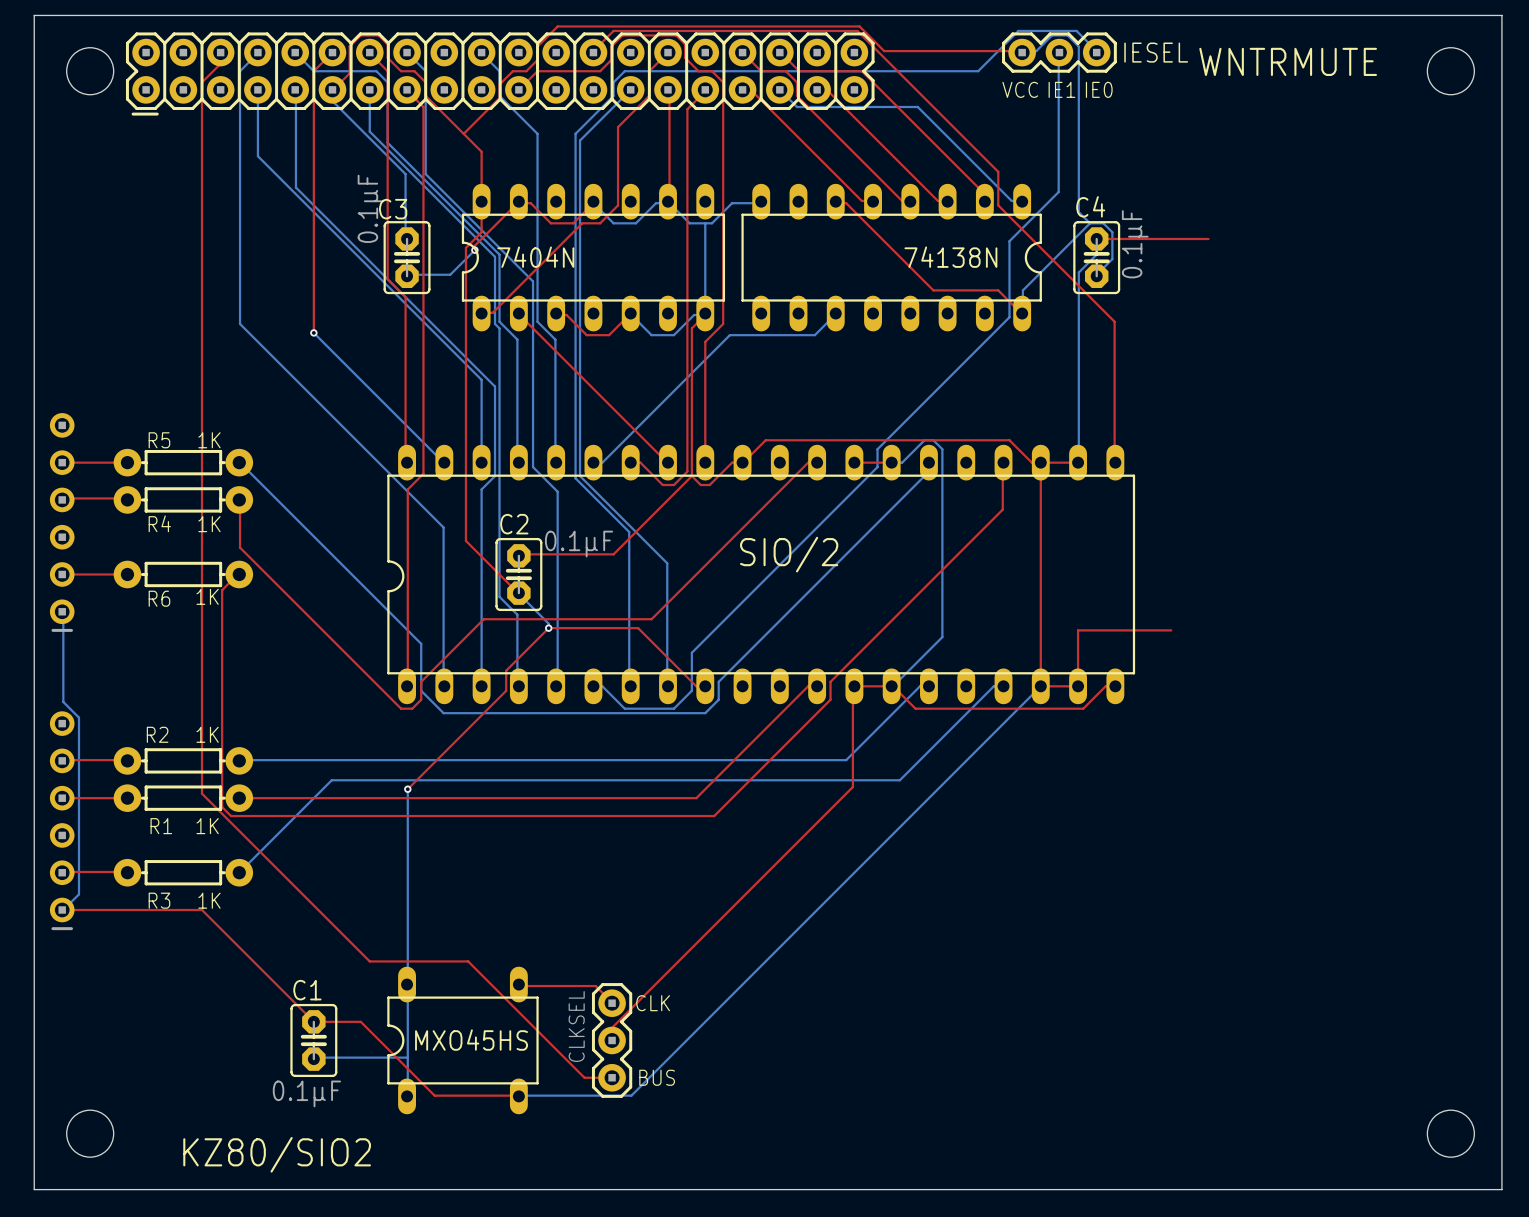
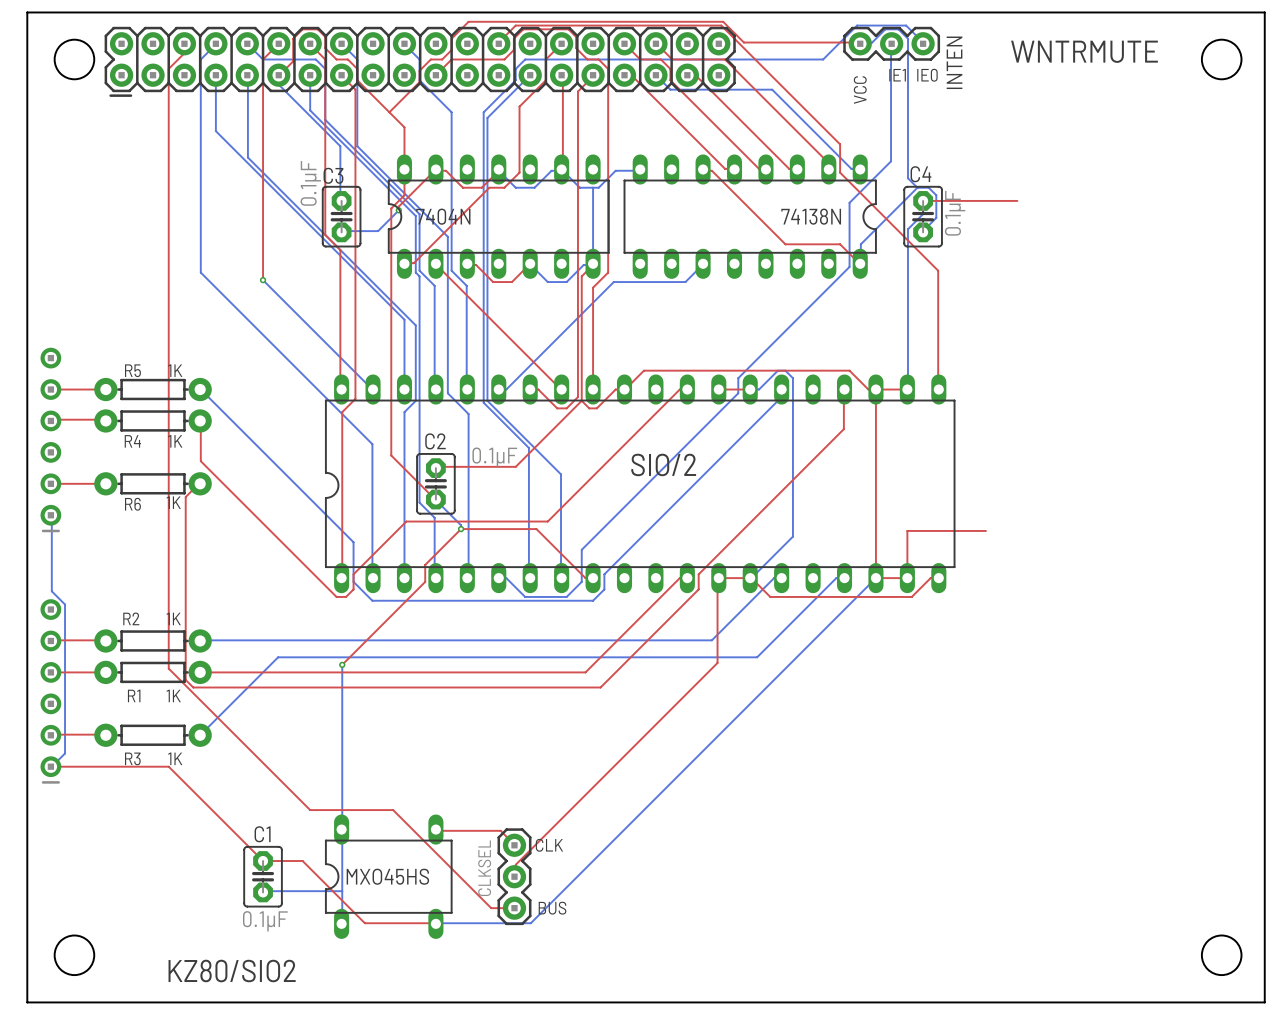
text: IESEL (1156, 52) -> none
text: none -> INTEN (954, 62)
text rotation: 0° (1020, 89) -> 90° counterclockwise (860, 90)

